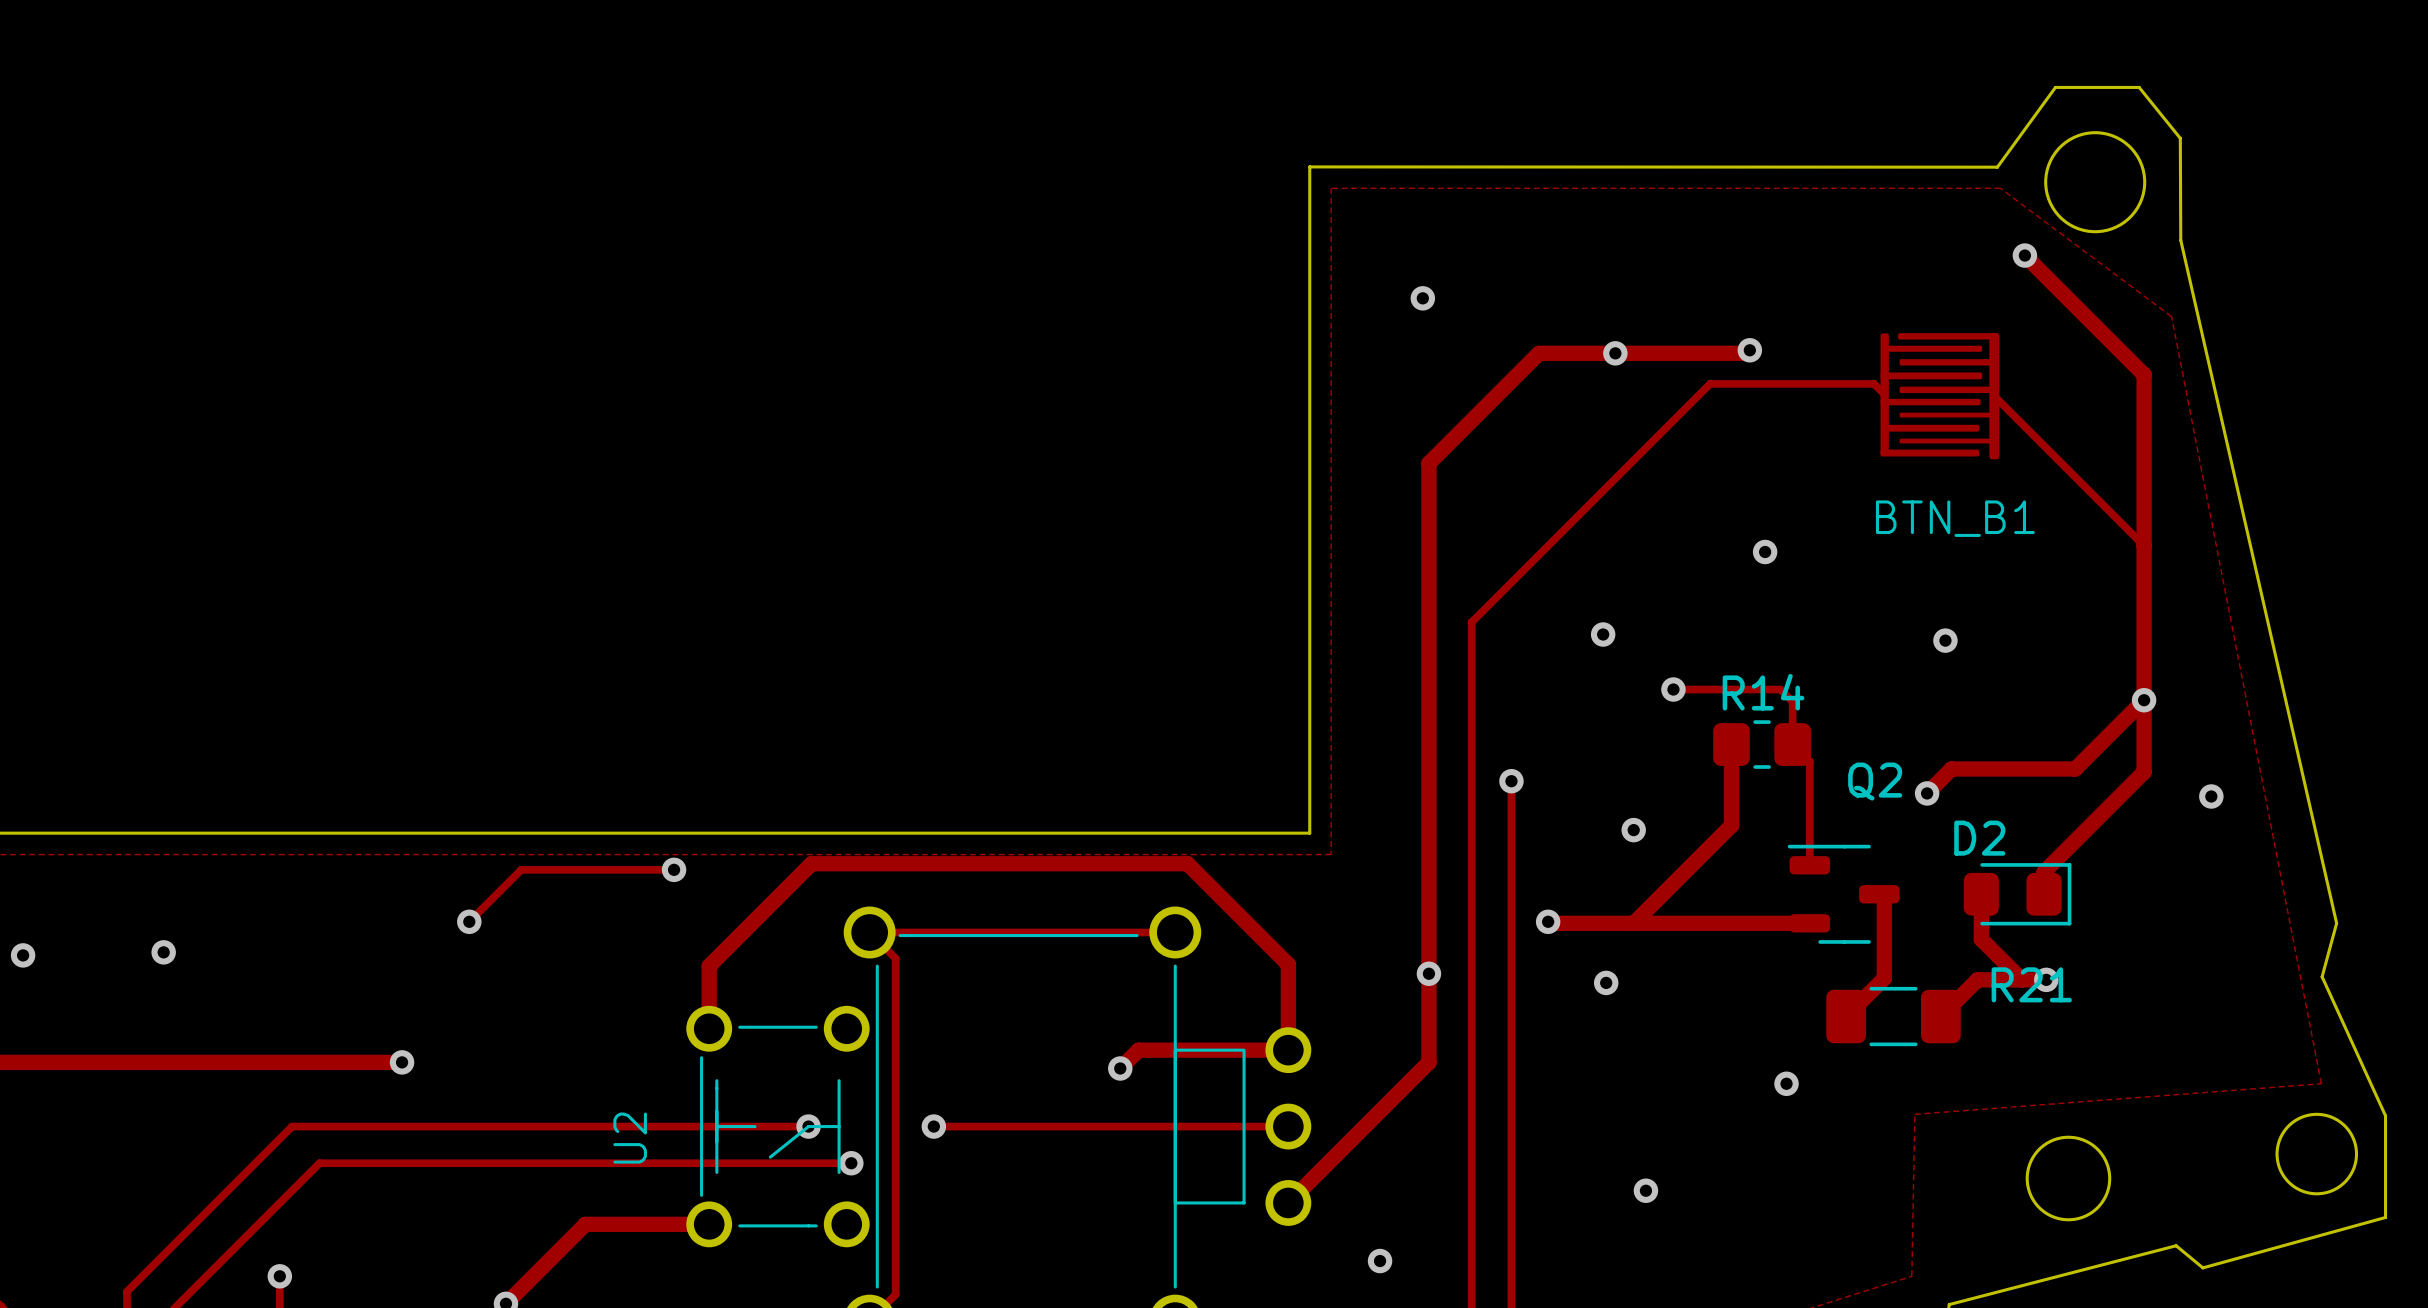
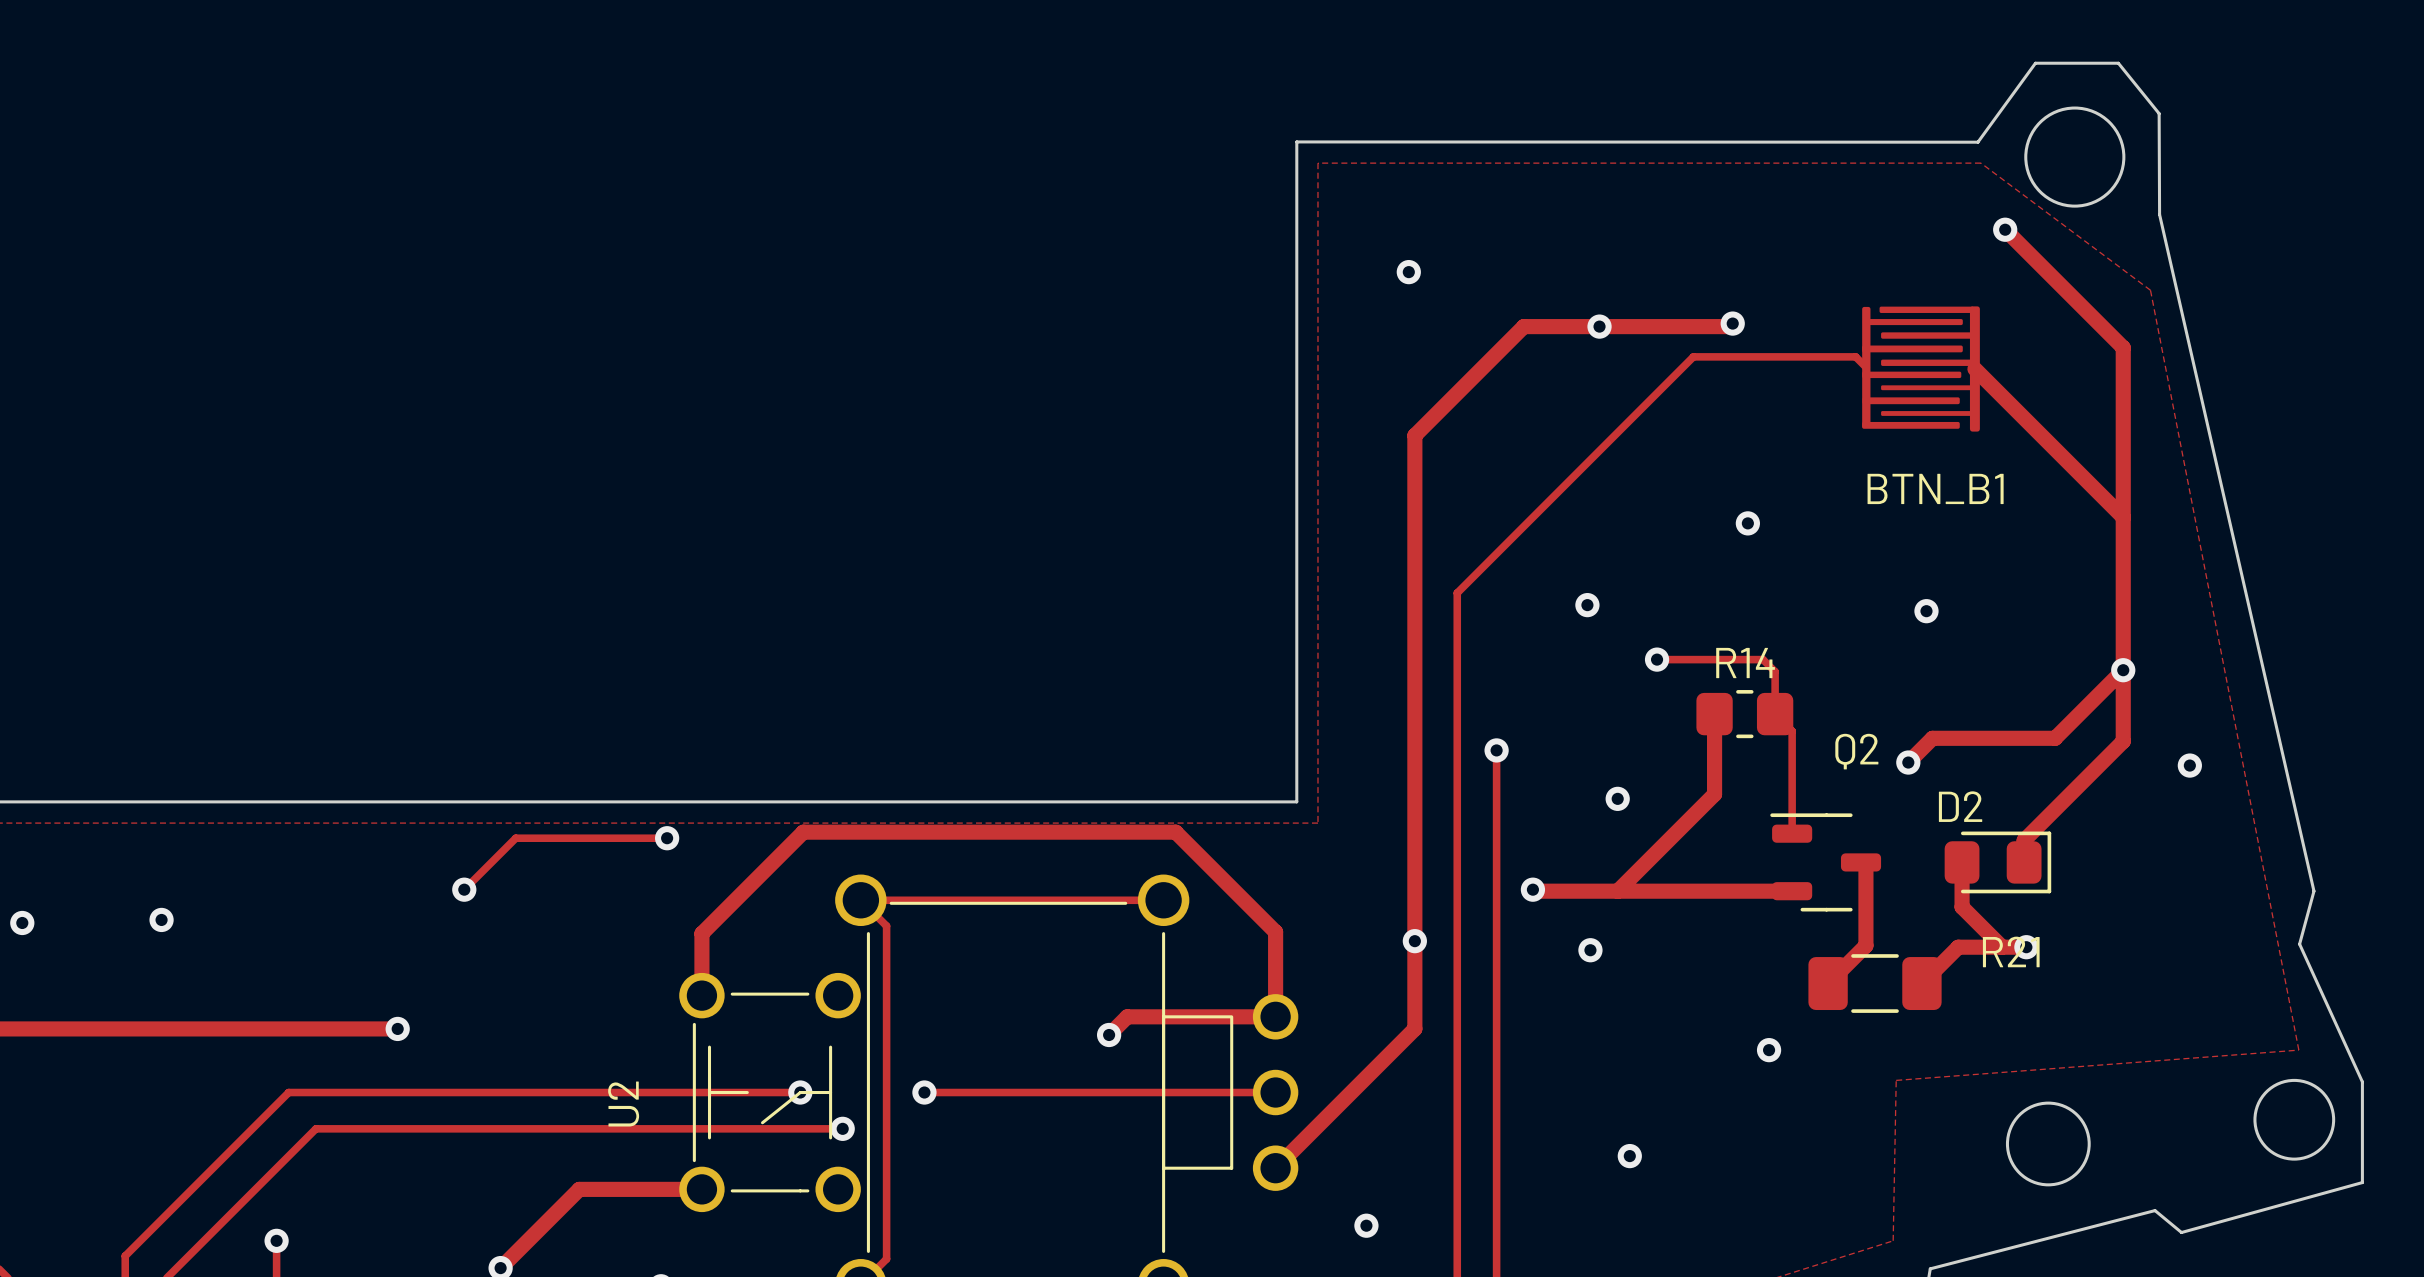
track width: thin (1994, 396) (2144, 545) -> thick (1974, 368) (2123, 517)

